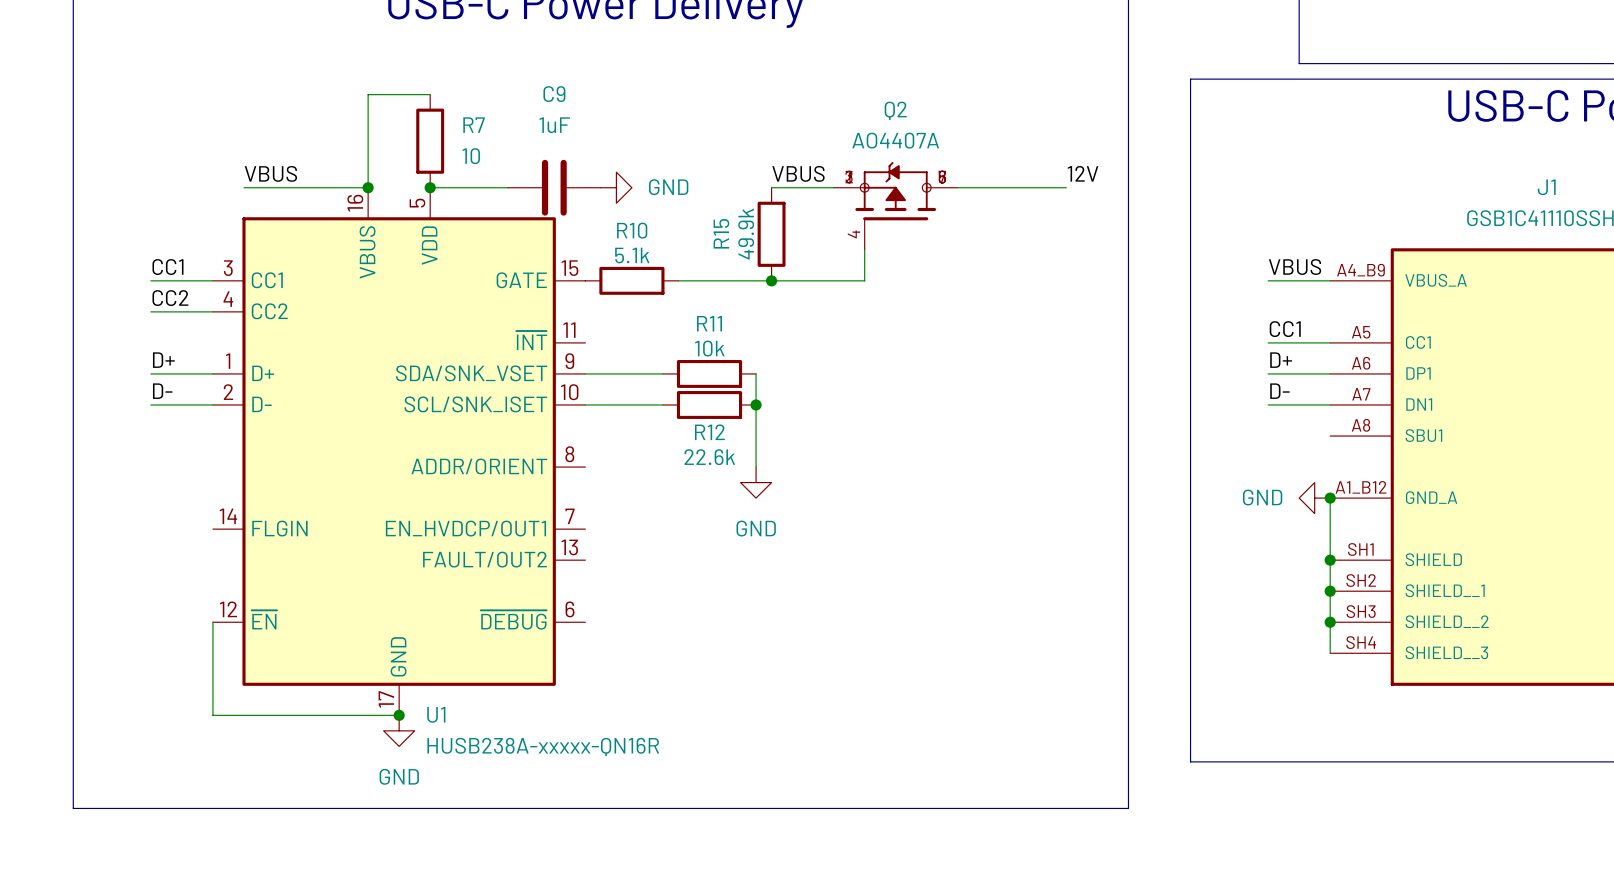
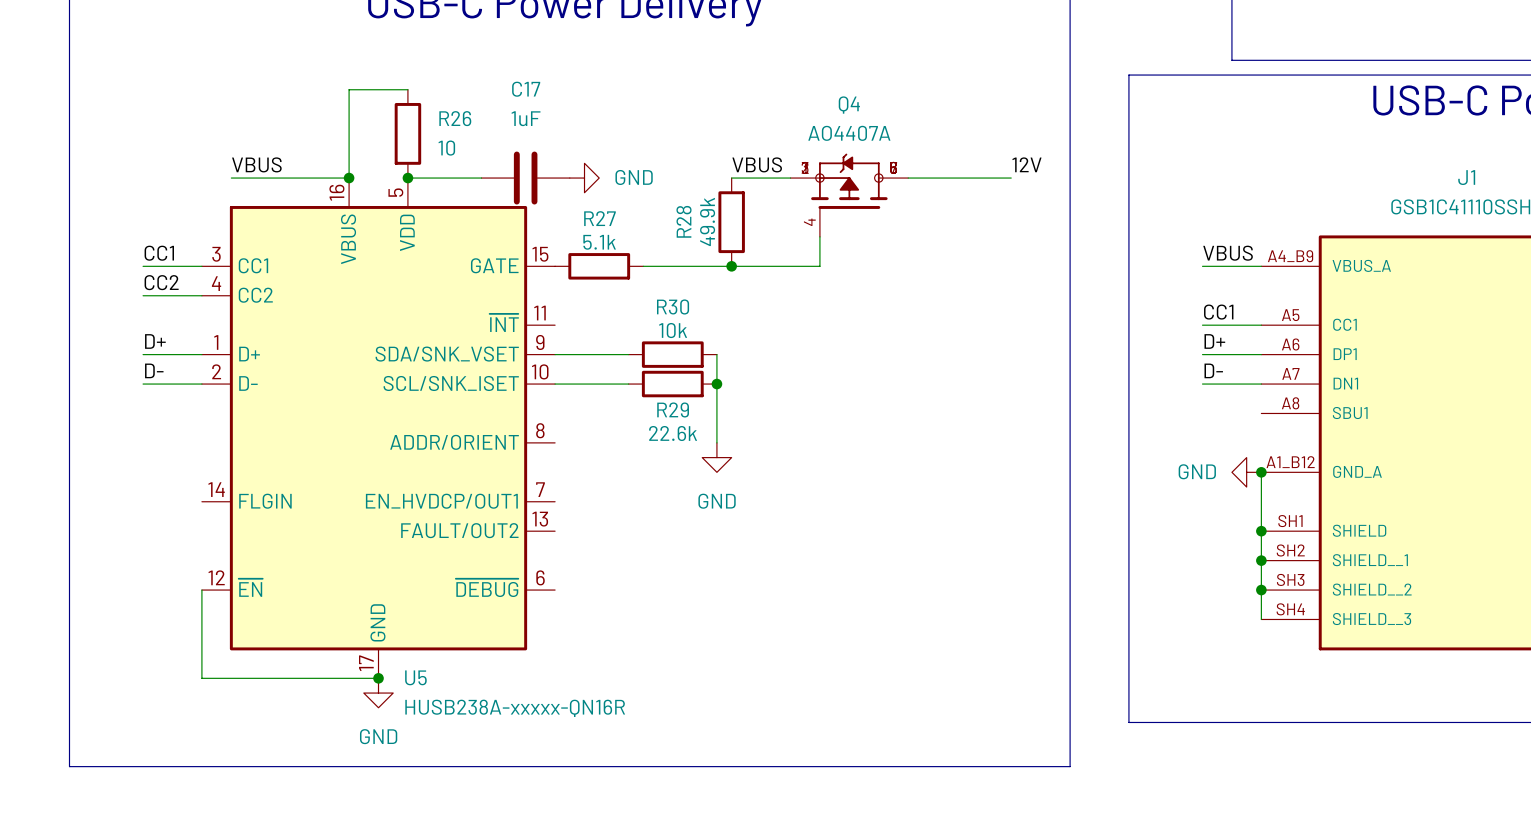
C9 name: C9 (554, 94) -> C17 (526, 89)
Q2 name: Q2 (895, 110) -> Q4 (849, 105)
R7 name: R7 (474, 125) -> R26 (455, 118)
R10 name: R10 (632, 230) -> R27 (599, 218)
R15 name: R15 (721, 233) -> R28 (683, 221)
R11 name: R11 (709, 323) -> R30 (673, 306)
R12 name: R12 (709, 432) -> R29 (673, 409)
U1 name: U1 (436, 714) -> U5 (415, 677)

